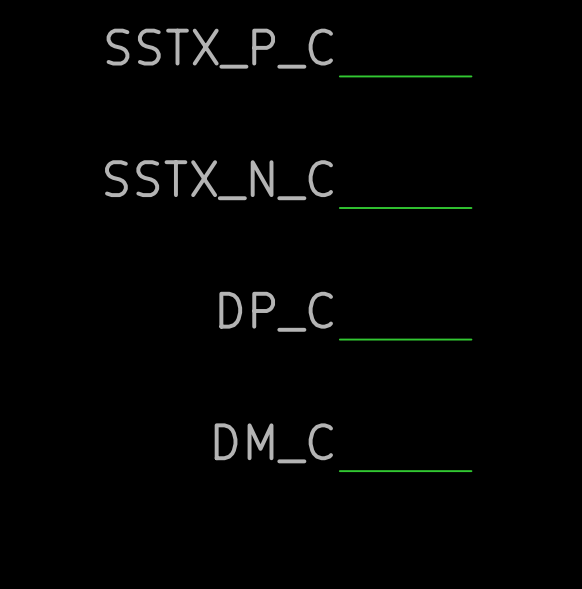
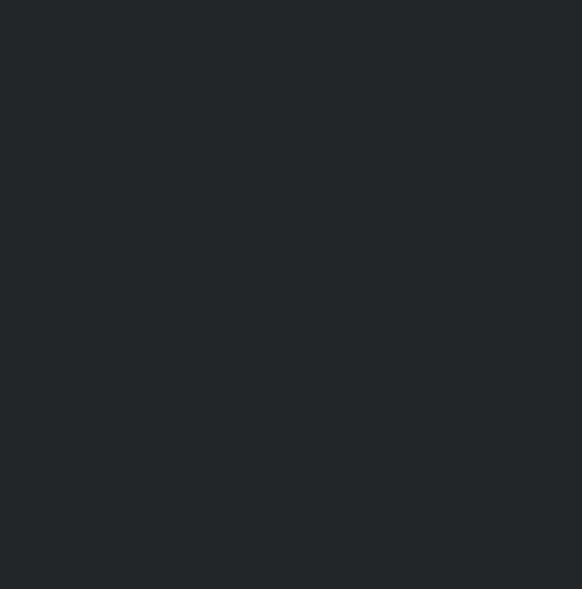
label: SSTX_P_C (219, 48) -> none
wire: (339, 76) (471, 76) -> none
label: SSTX_N_C (219, 180) -> none
wire: (339, 208) (471, 208) -> none
label: DP_C (276, 311) -> none
wire: (339, 339) (471, 339) -> none
label: DM_C (273, 443) -> none
wire: (339, 471) (471, 471) -> none

